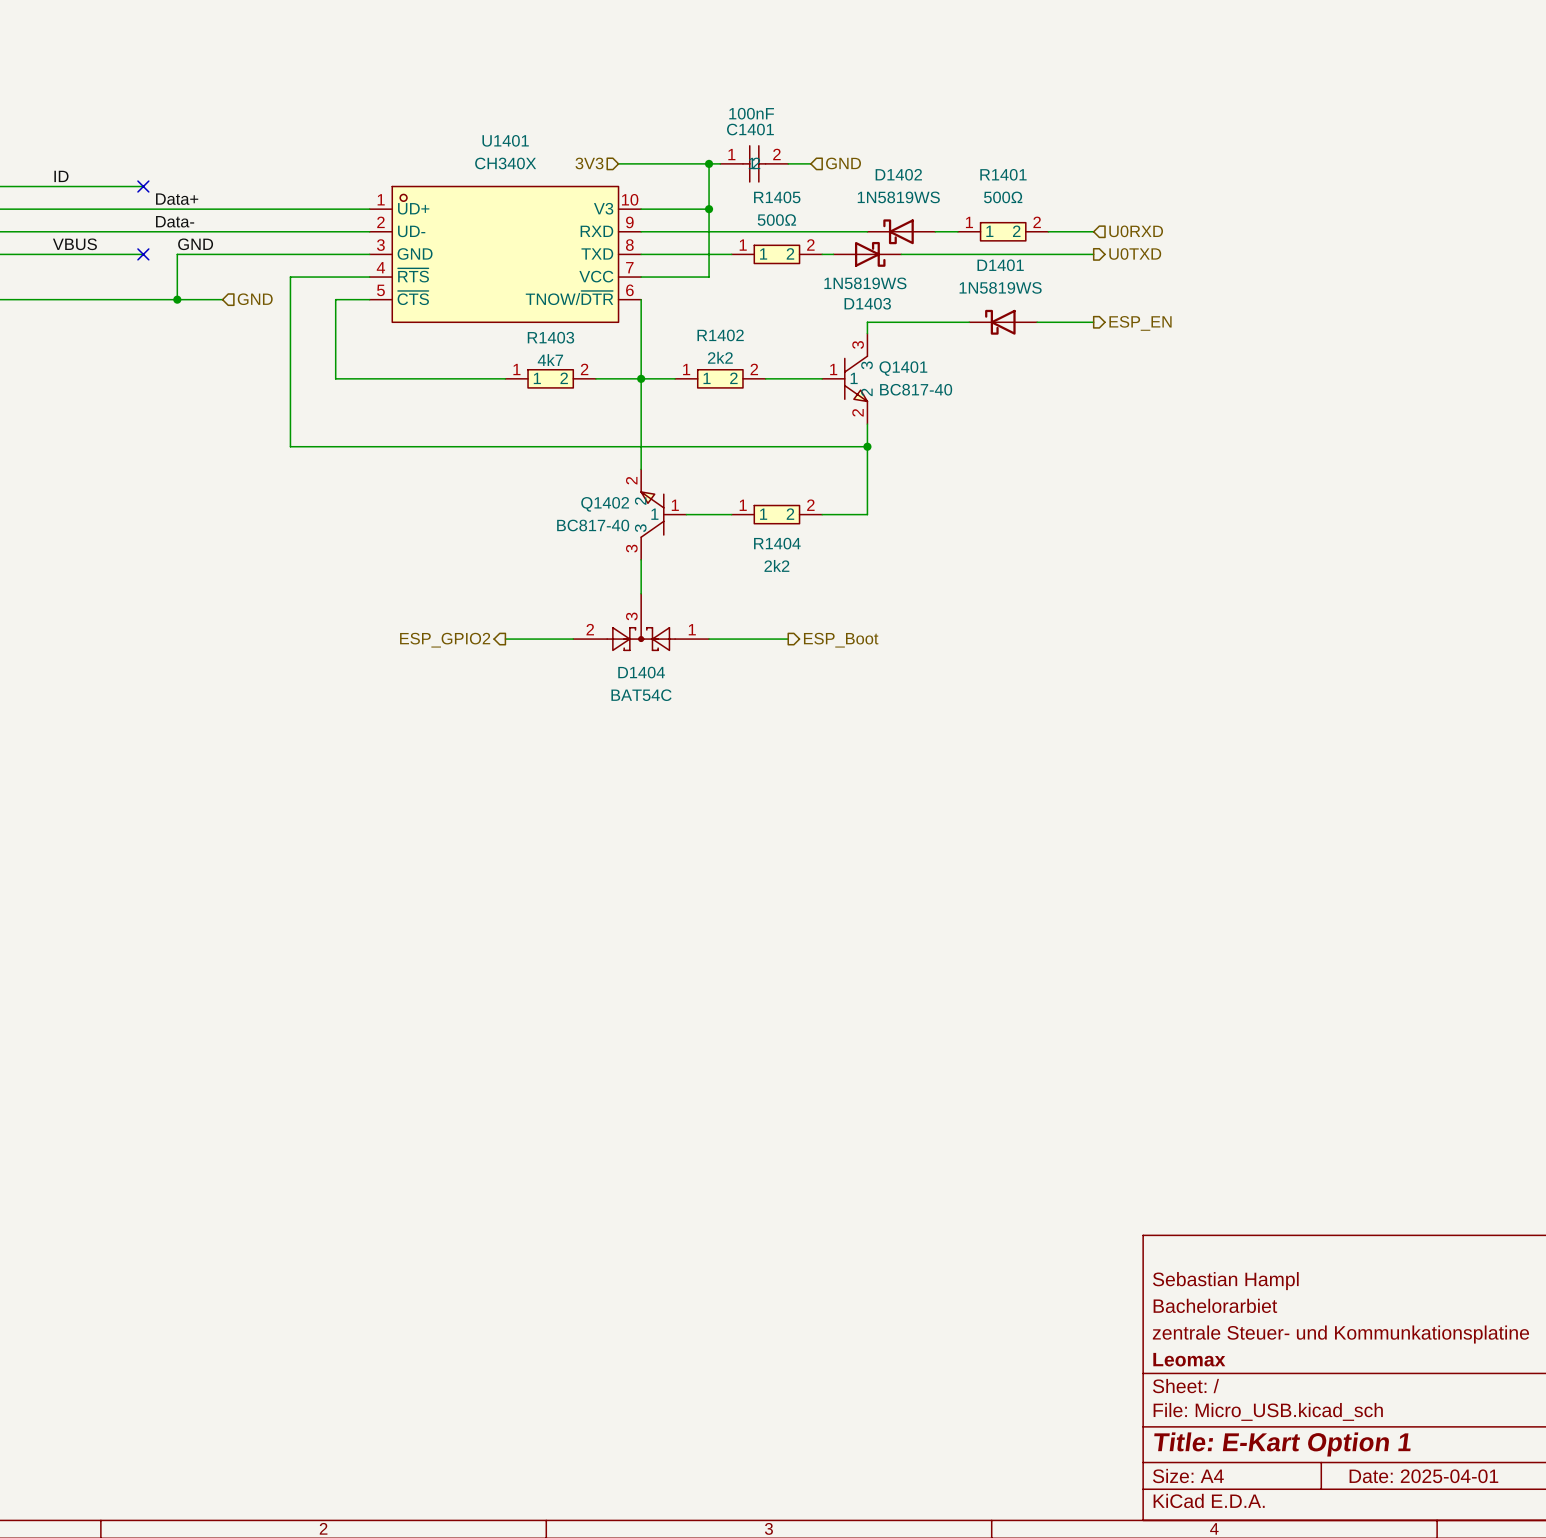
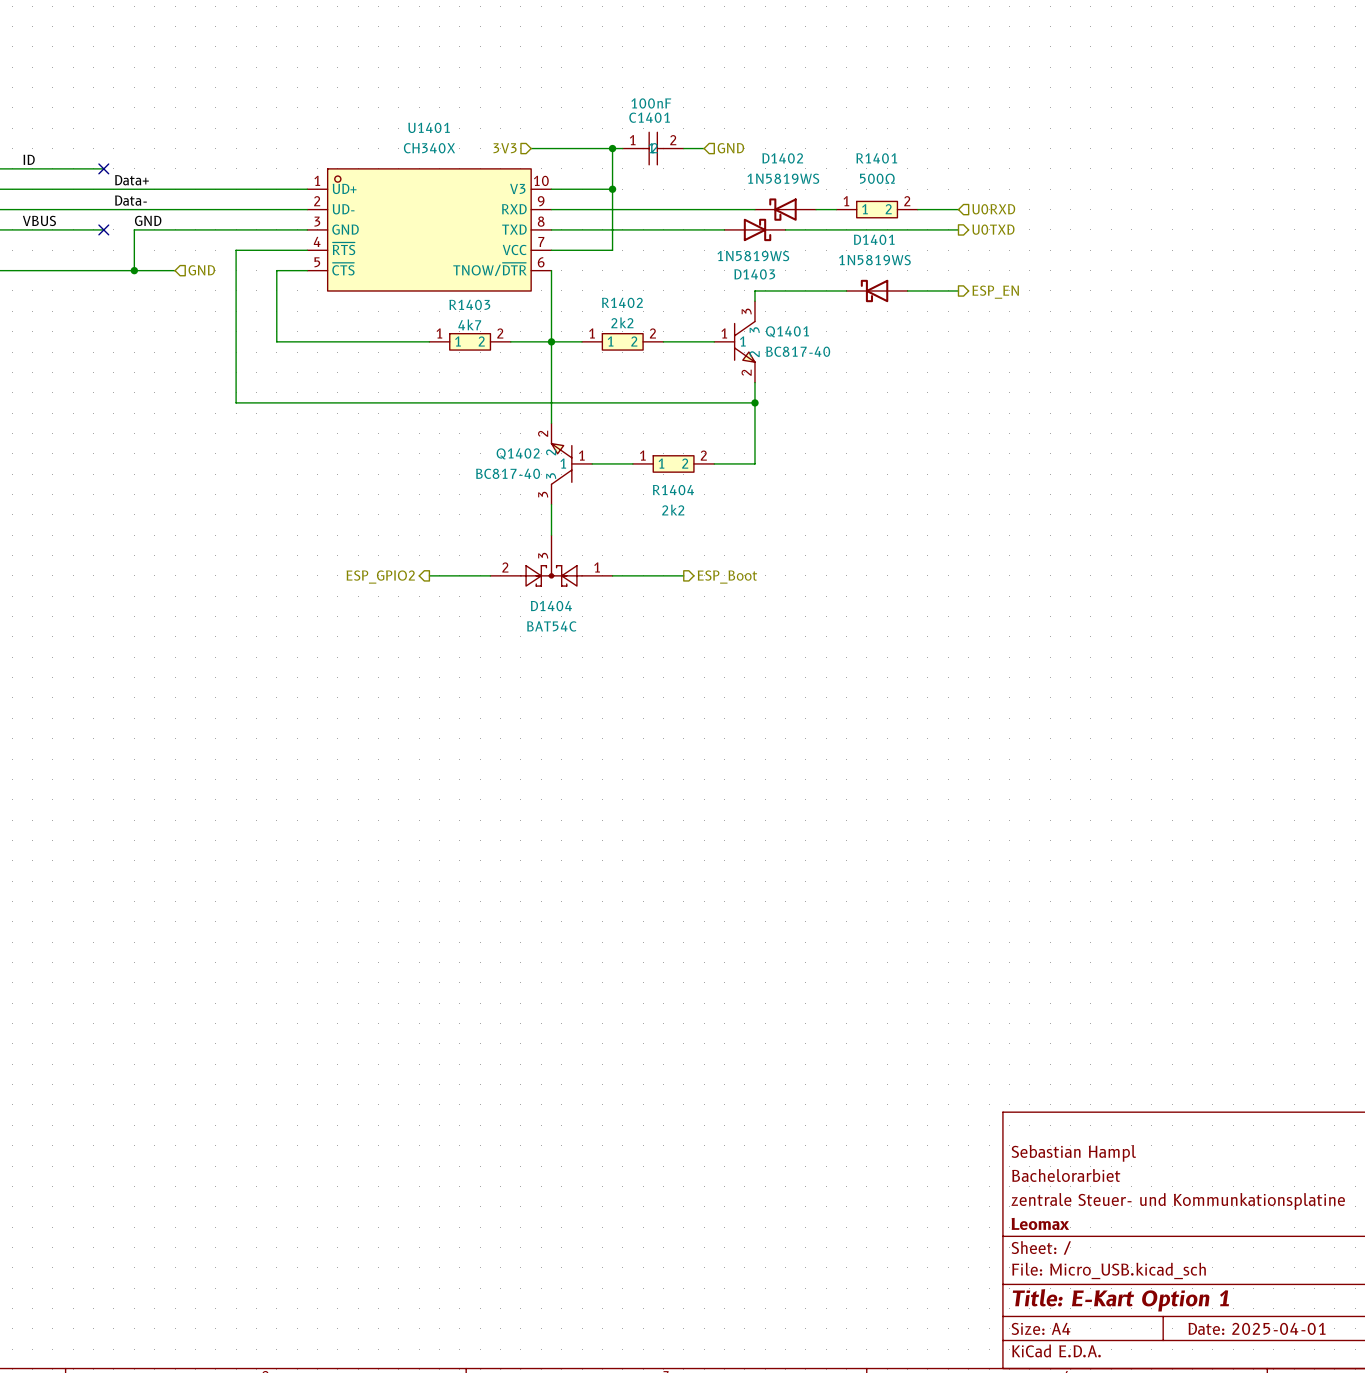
R1405: 500Ω (776, 254) -> none

